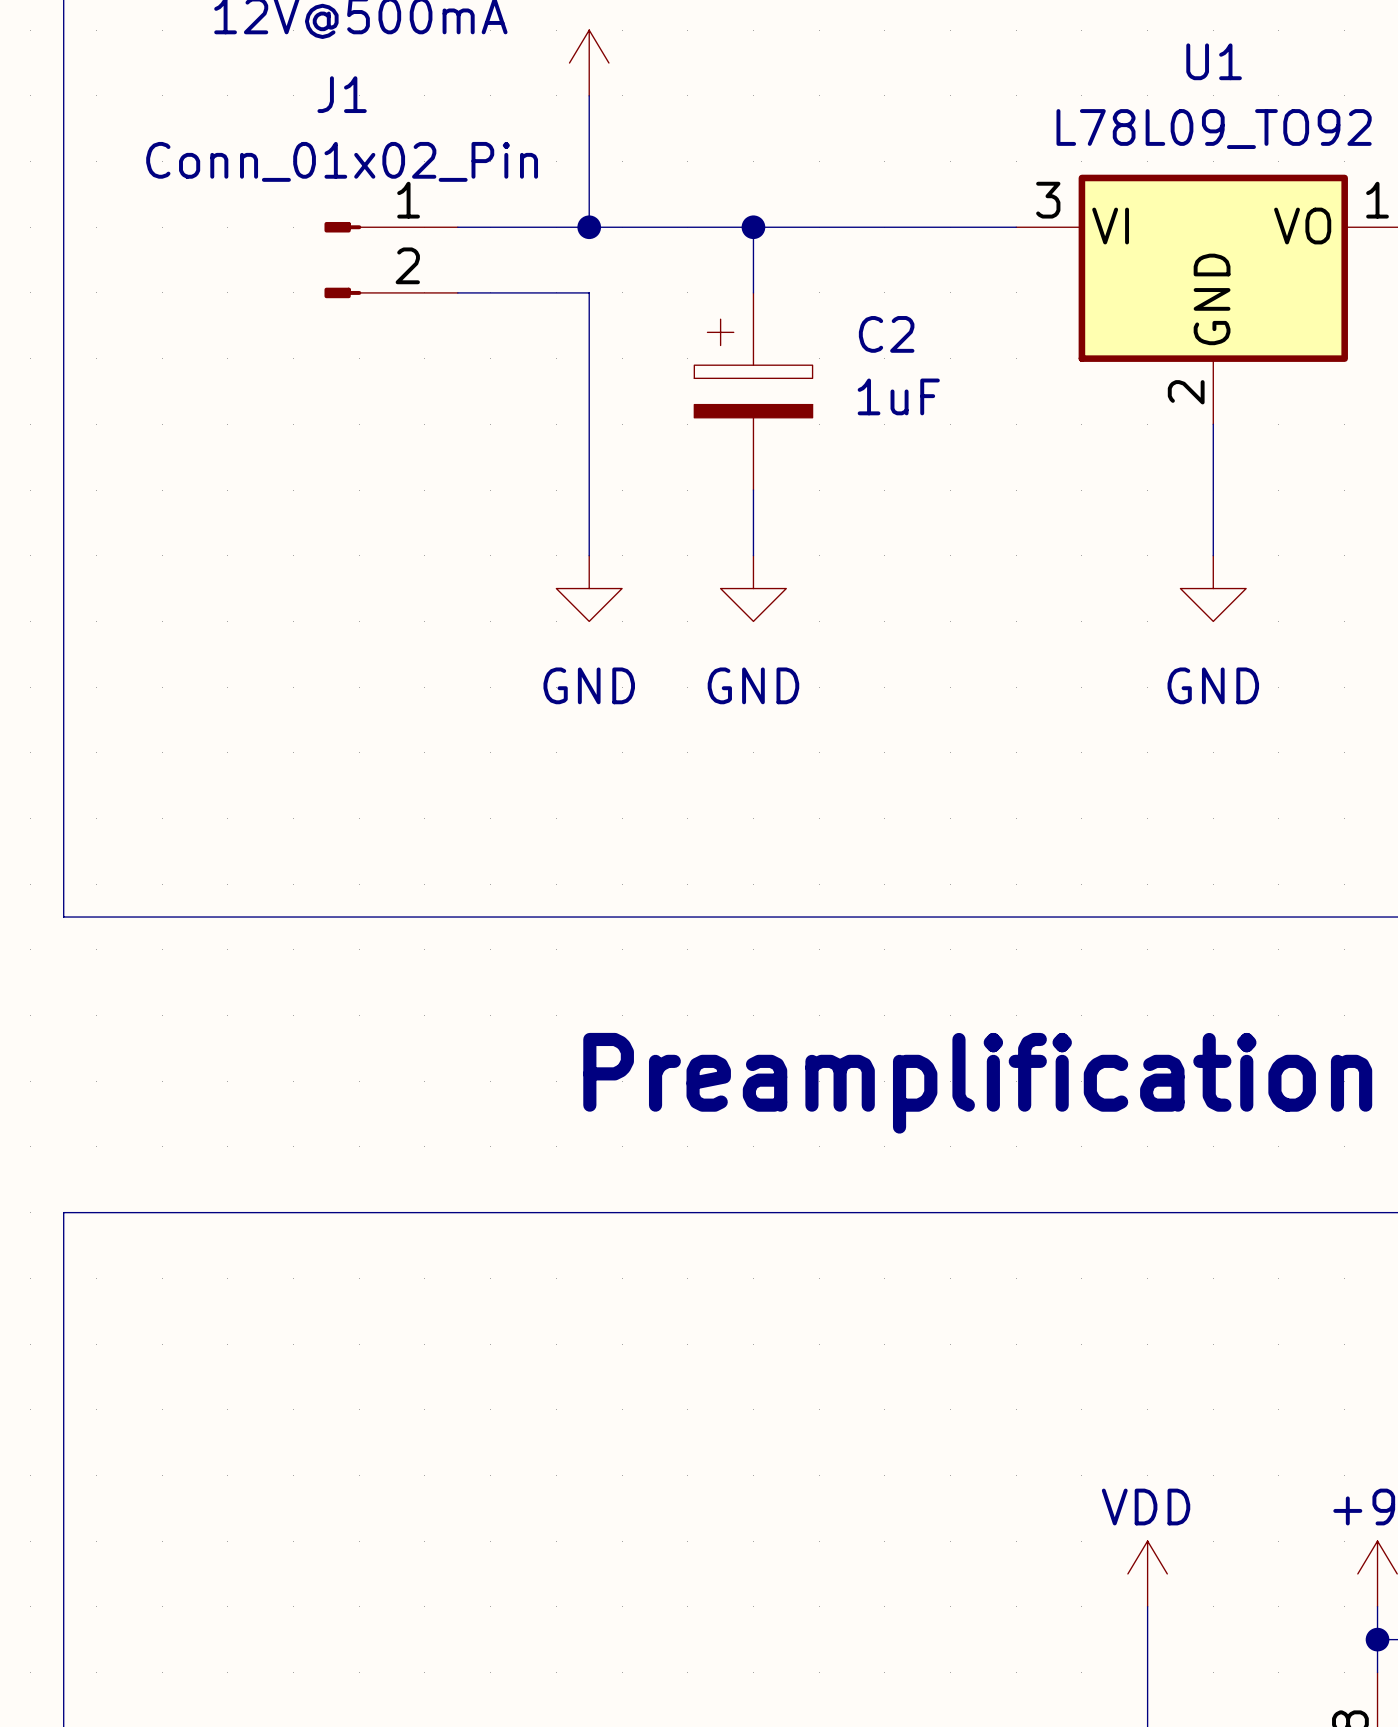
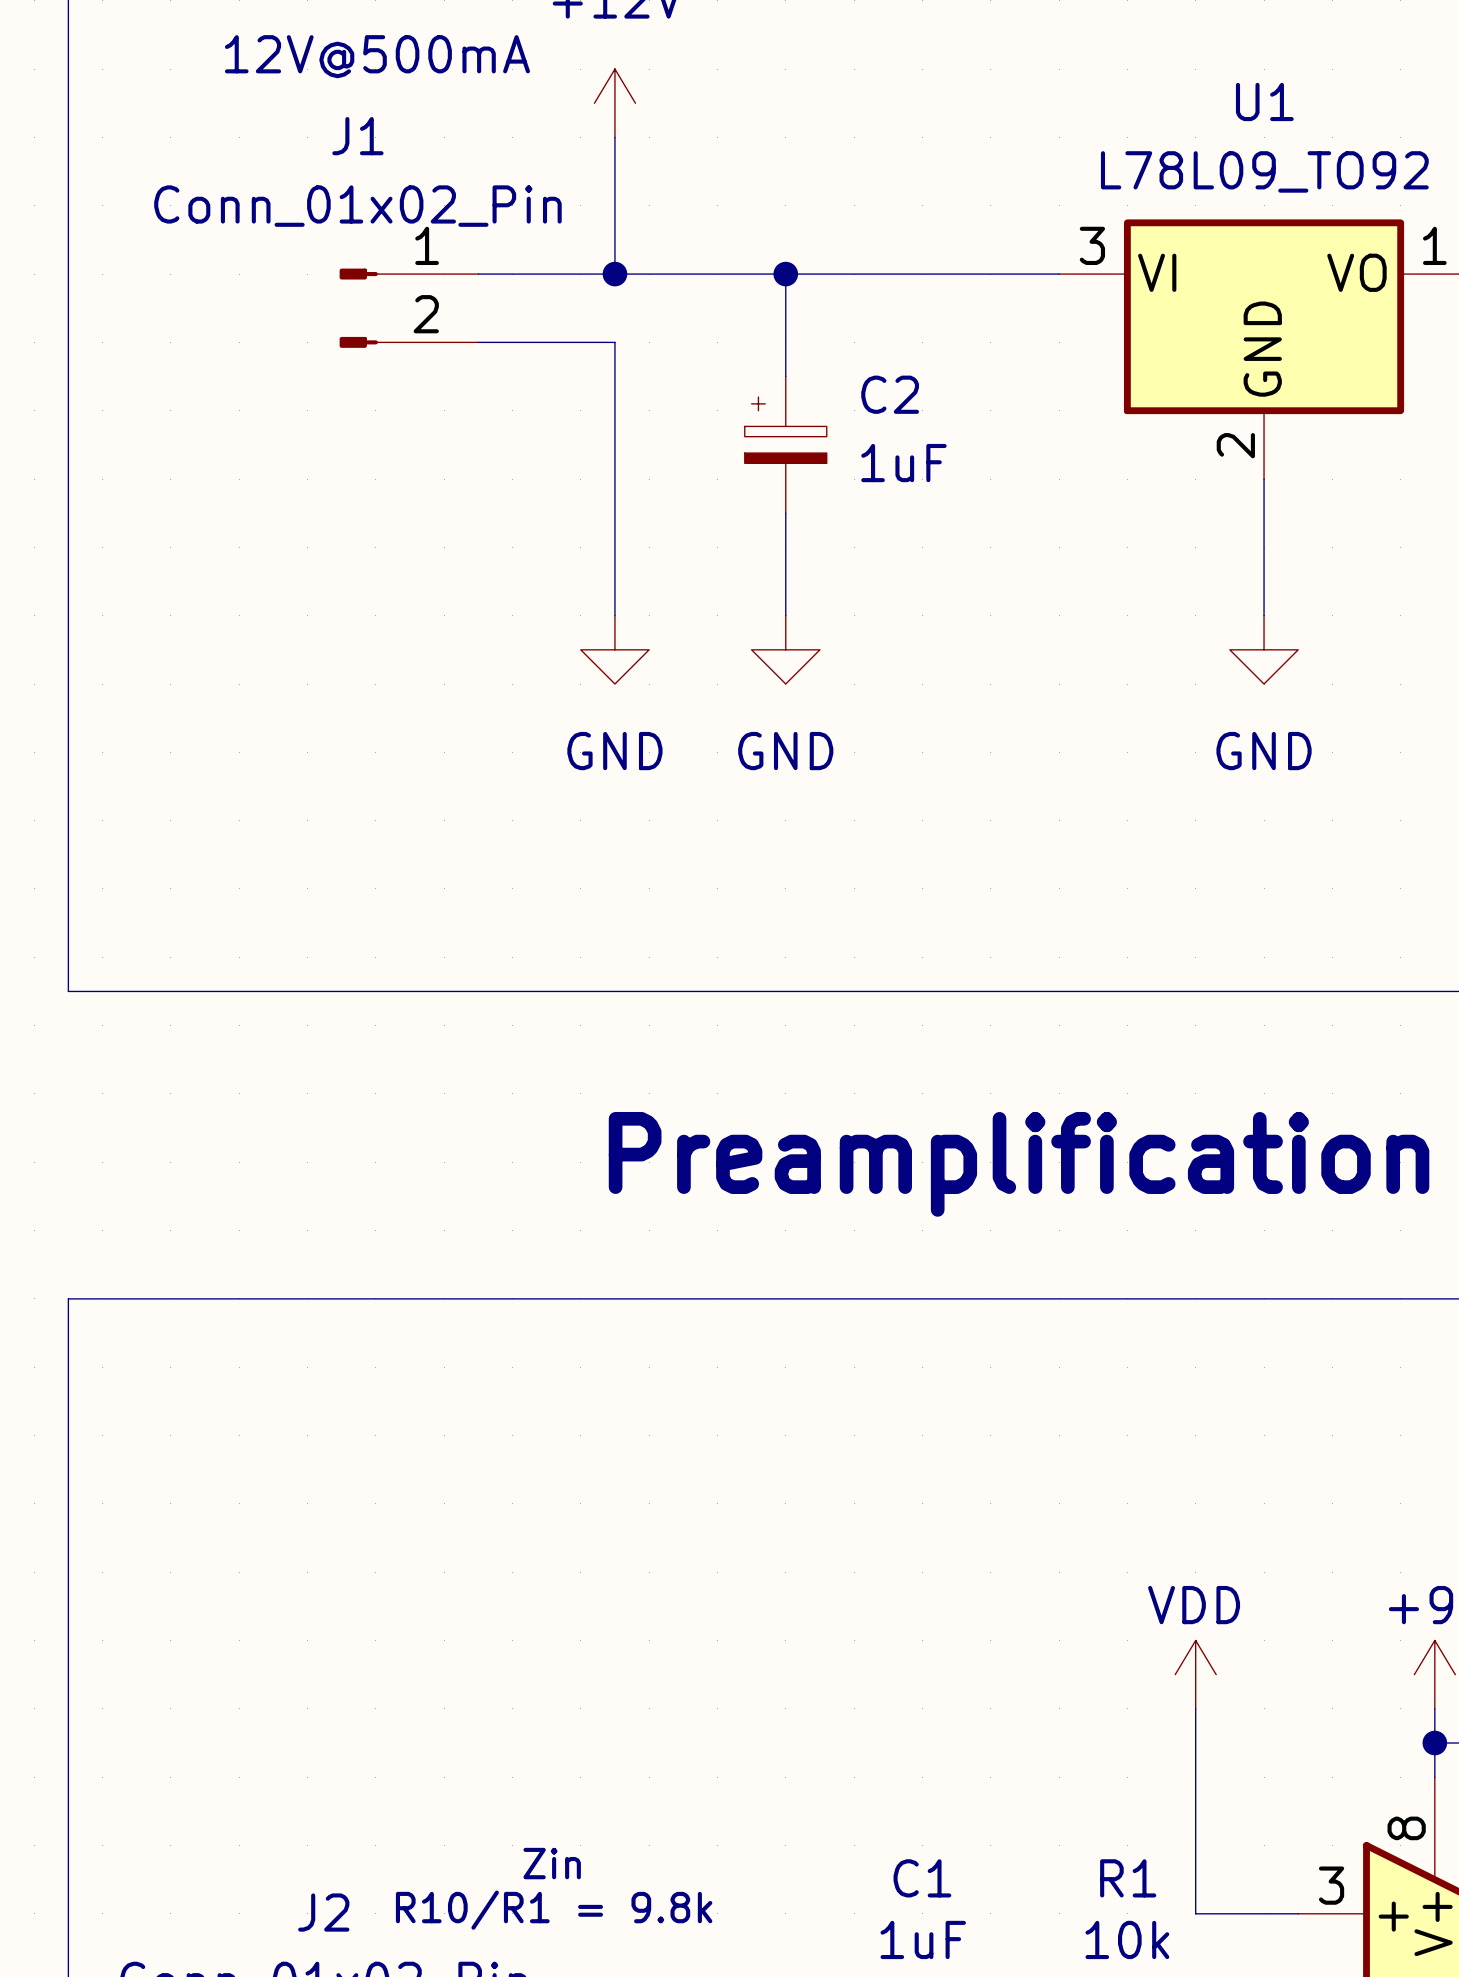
C2 symbol: [694, 292, 813, 491] -> [744, 376, 827, 514]
text: 1uF (898, 396) -> none
C2 value: none -> 1uF (903, 463)

